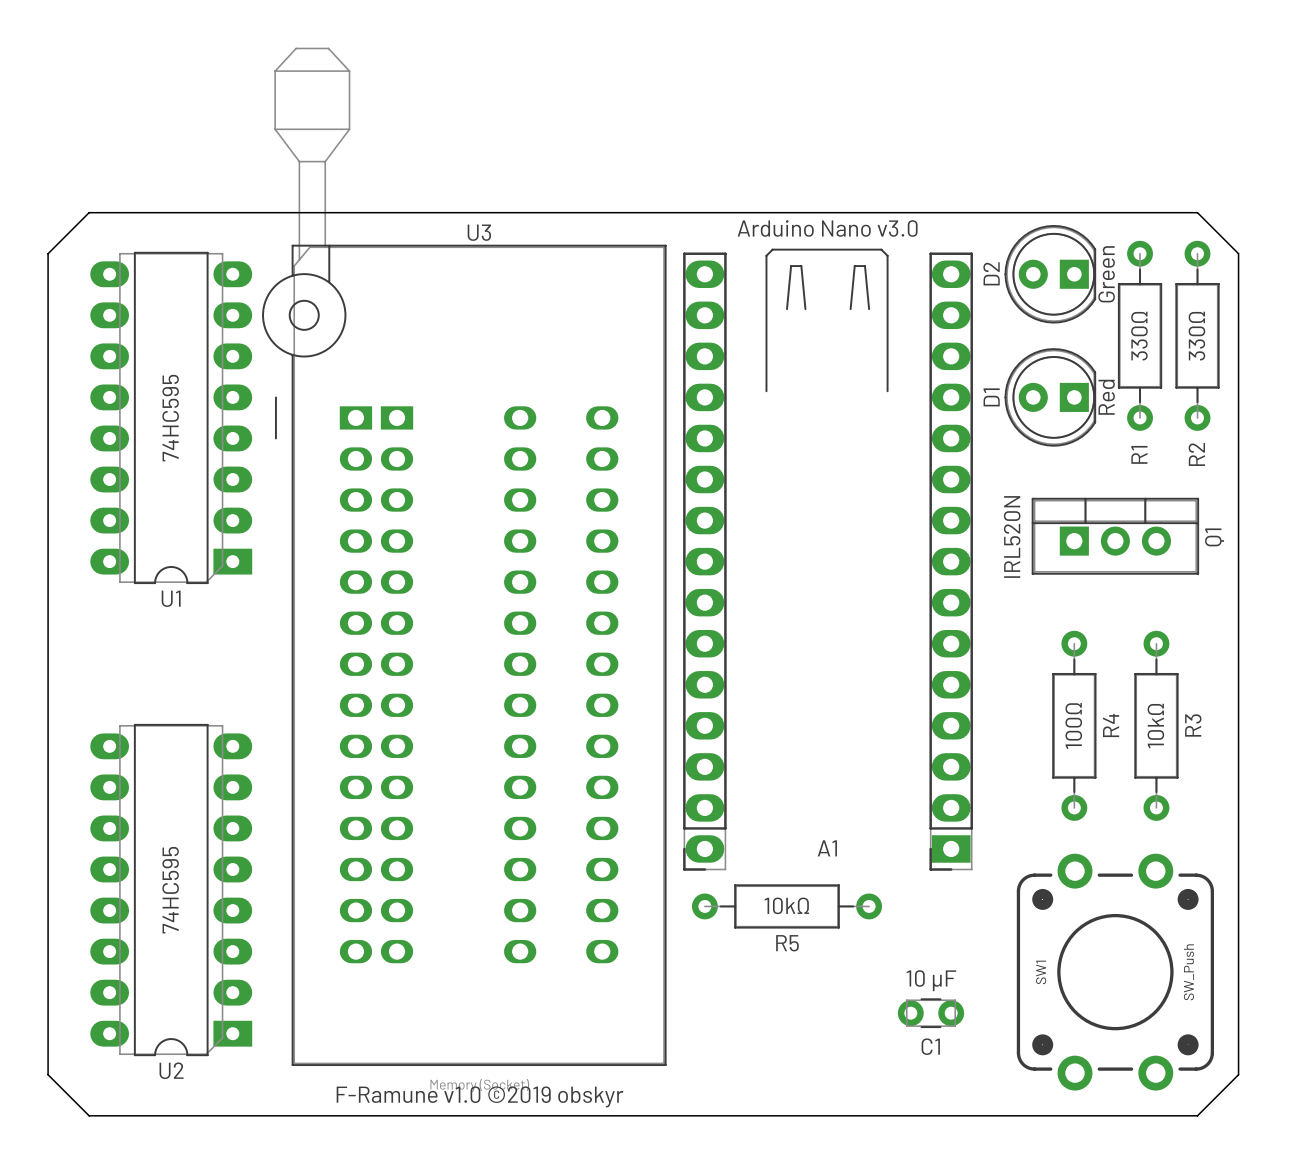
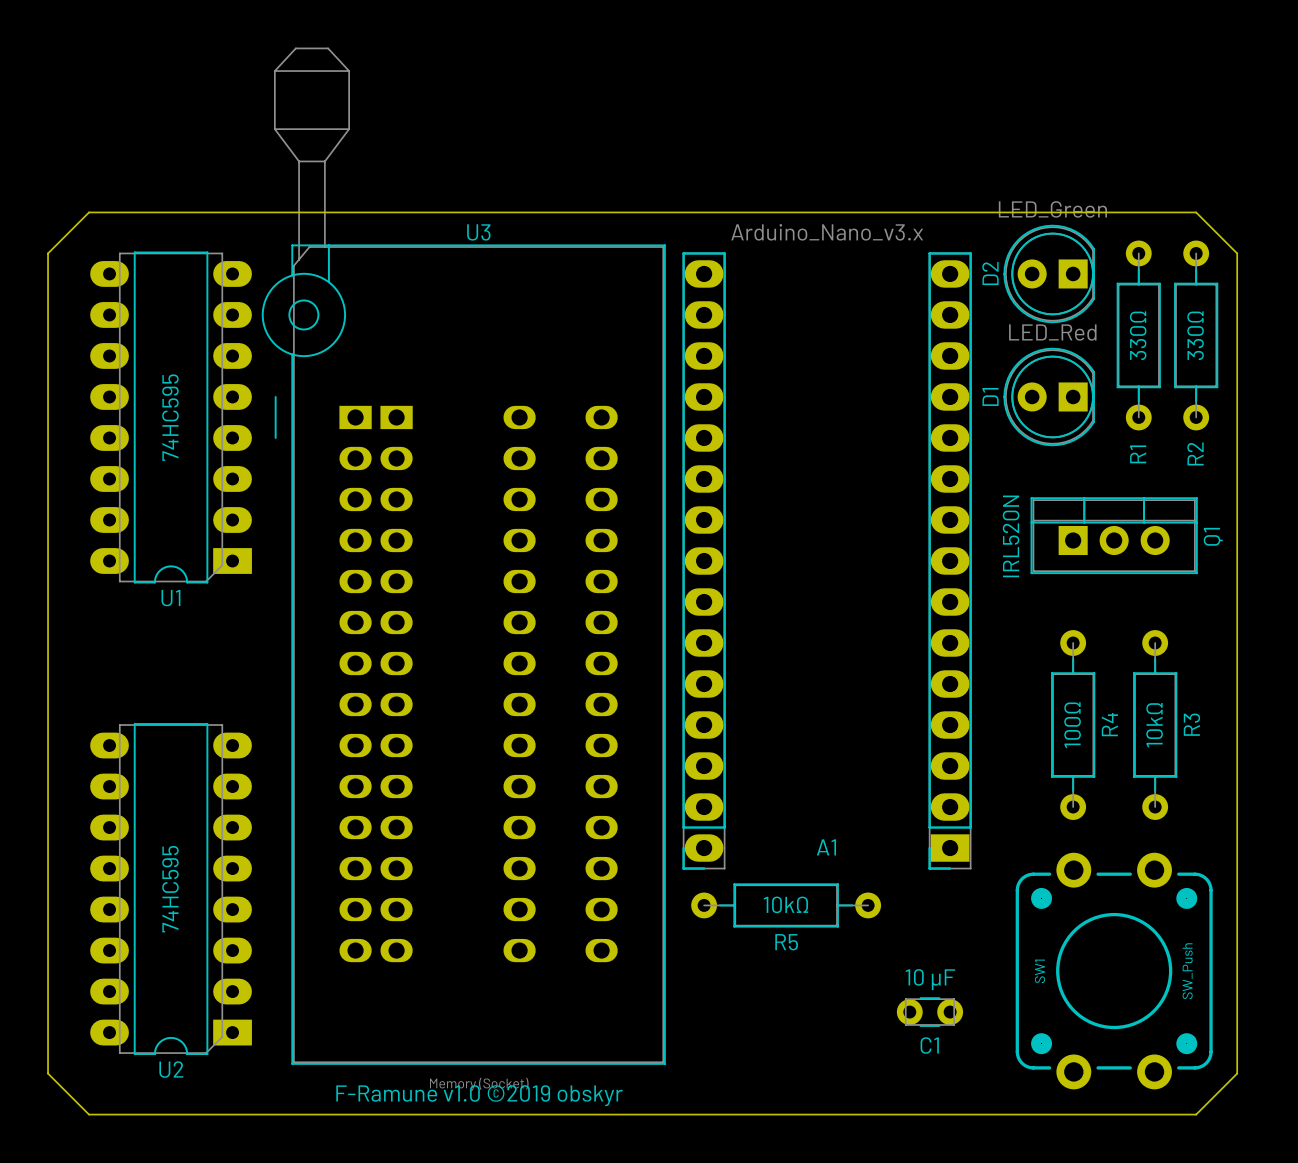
A1 value: Arduino Nano v3.0 (827, 228) -> Arduino_Nano_v3.x (827, 232)
D2 value: Green (1106, 274) -> LED_Green (1052, 209)
line: (786, 309) (791, 266) (801, 266) (805, 309) -> none
line: (850, 309) (854, 266) (864, 266) (869, 309) -> none
line: (766, 391) (766, 255) (772, 249) (881, 249) (887, 255) (887, 391) -> none
D1 value: Red (1106, 397) -> LED_Red (1052, 332)

